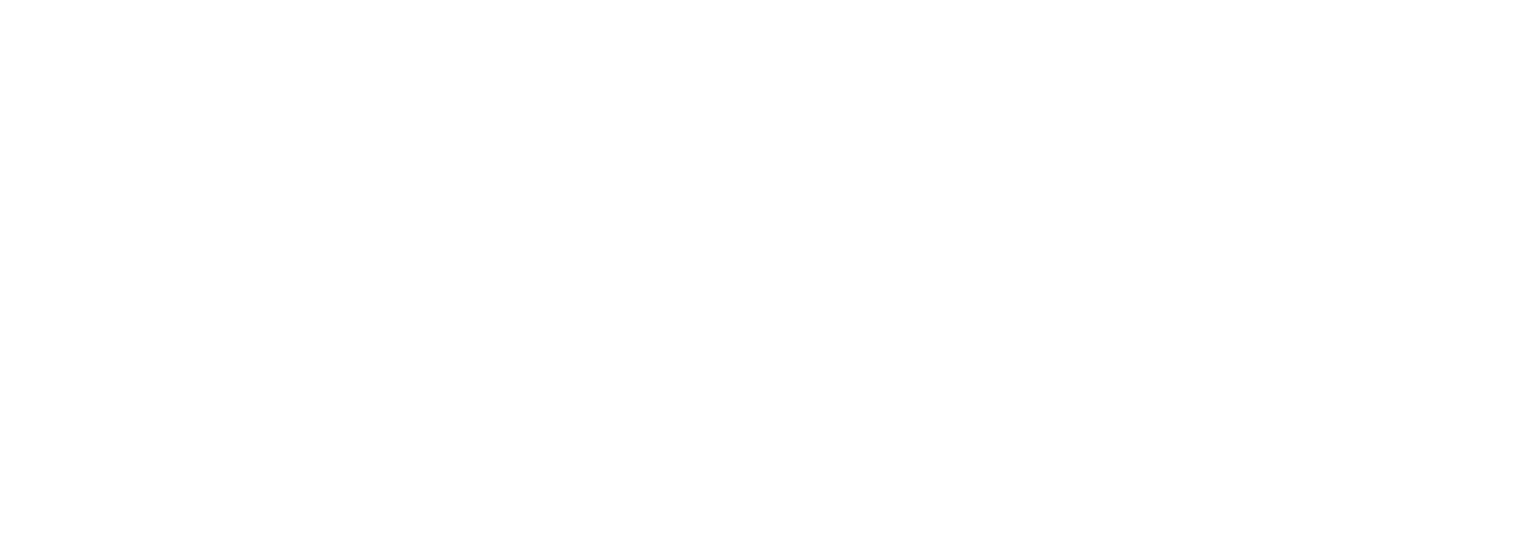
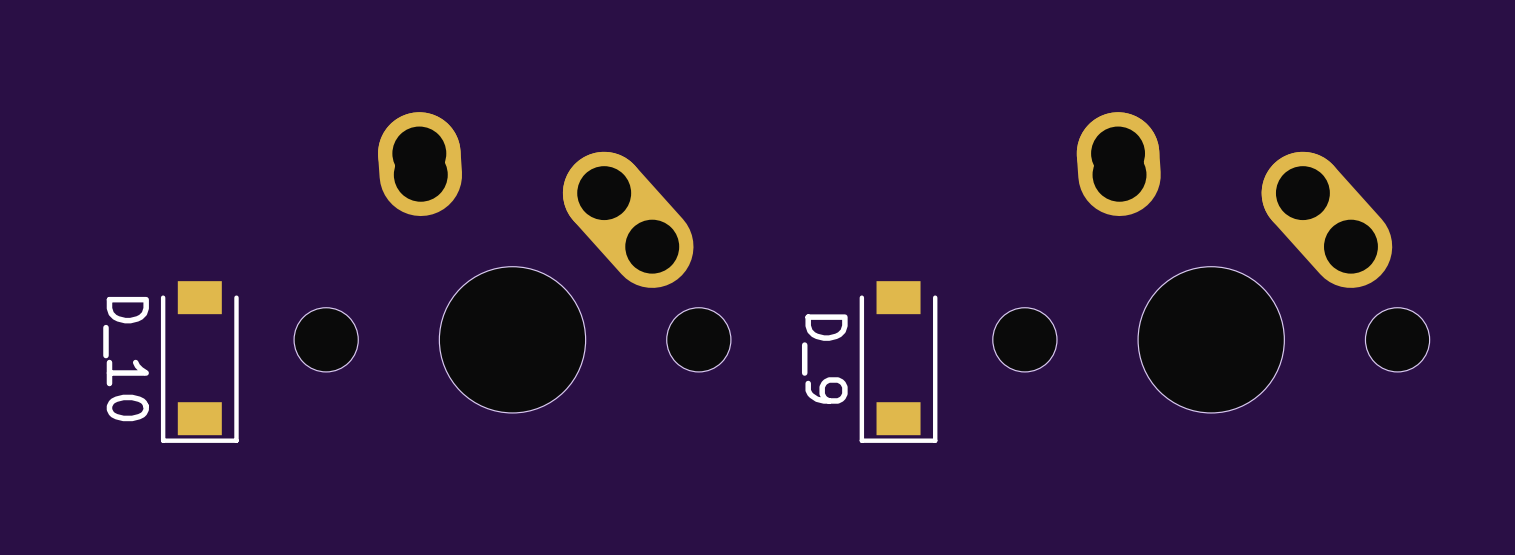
part: none -> (512, 262)
part: none -> (1211, 262)
D_10: none -> (199, 362)
D_9: none -> (898, 362)

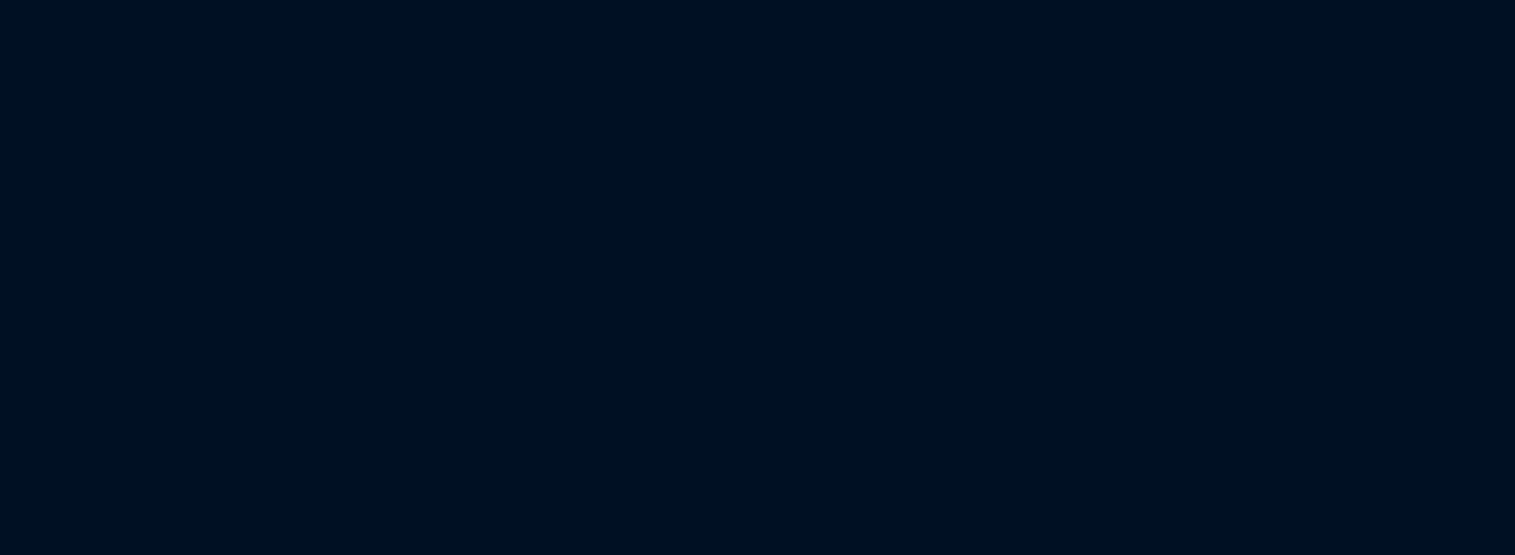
part: (512, 262) -> none
part: (1211, 262) -> none
D_10: (199, 362) -> none
D_9: (898, 362) -> none

